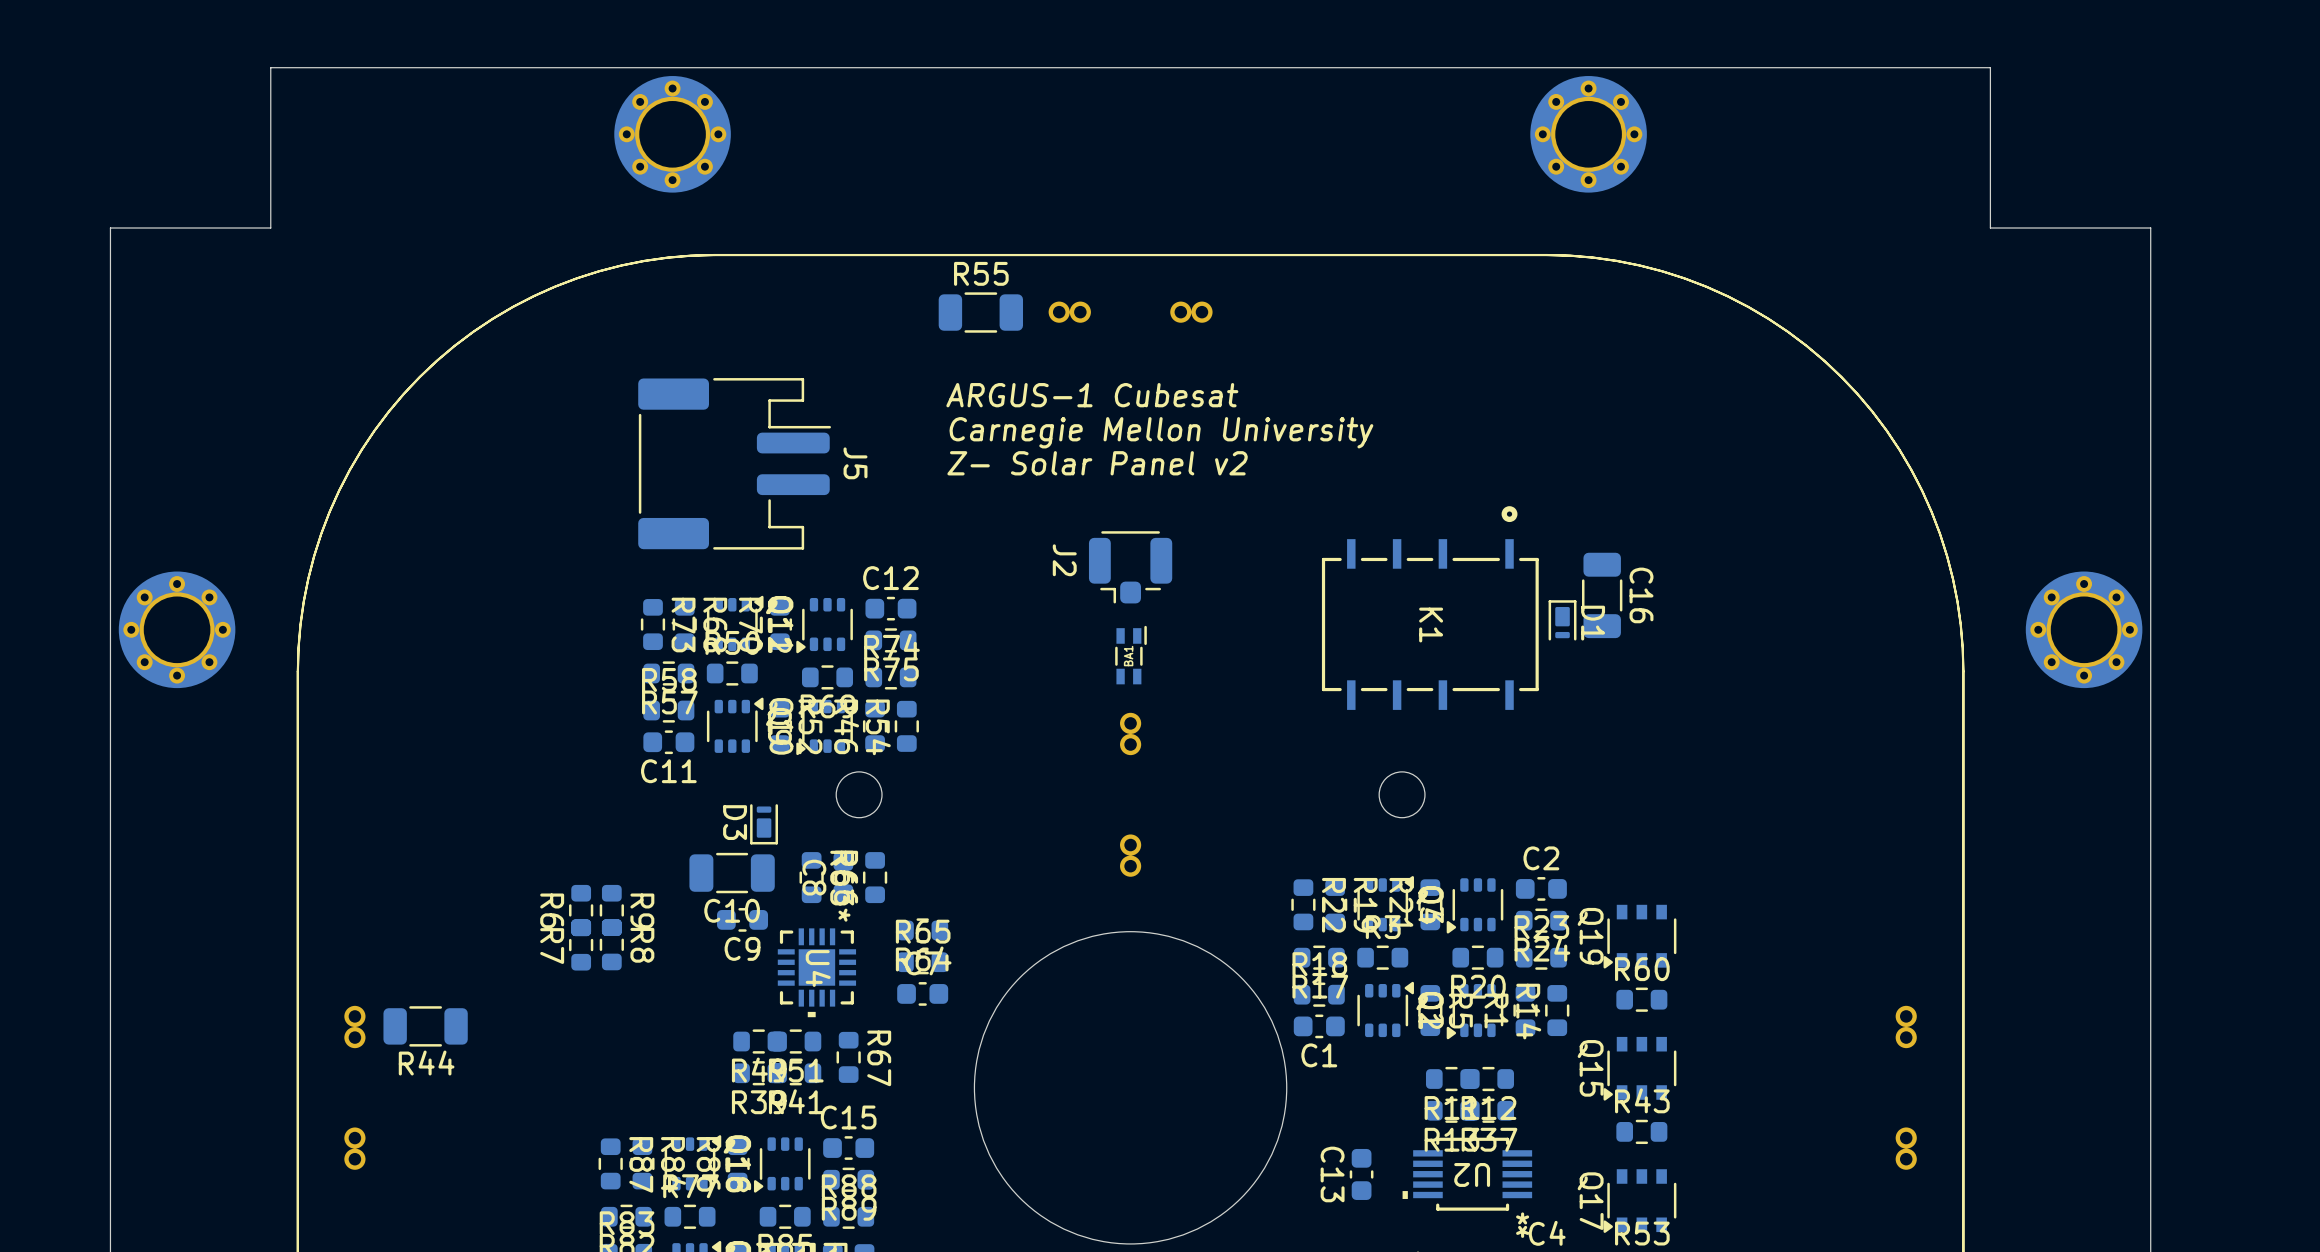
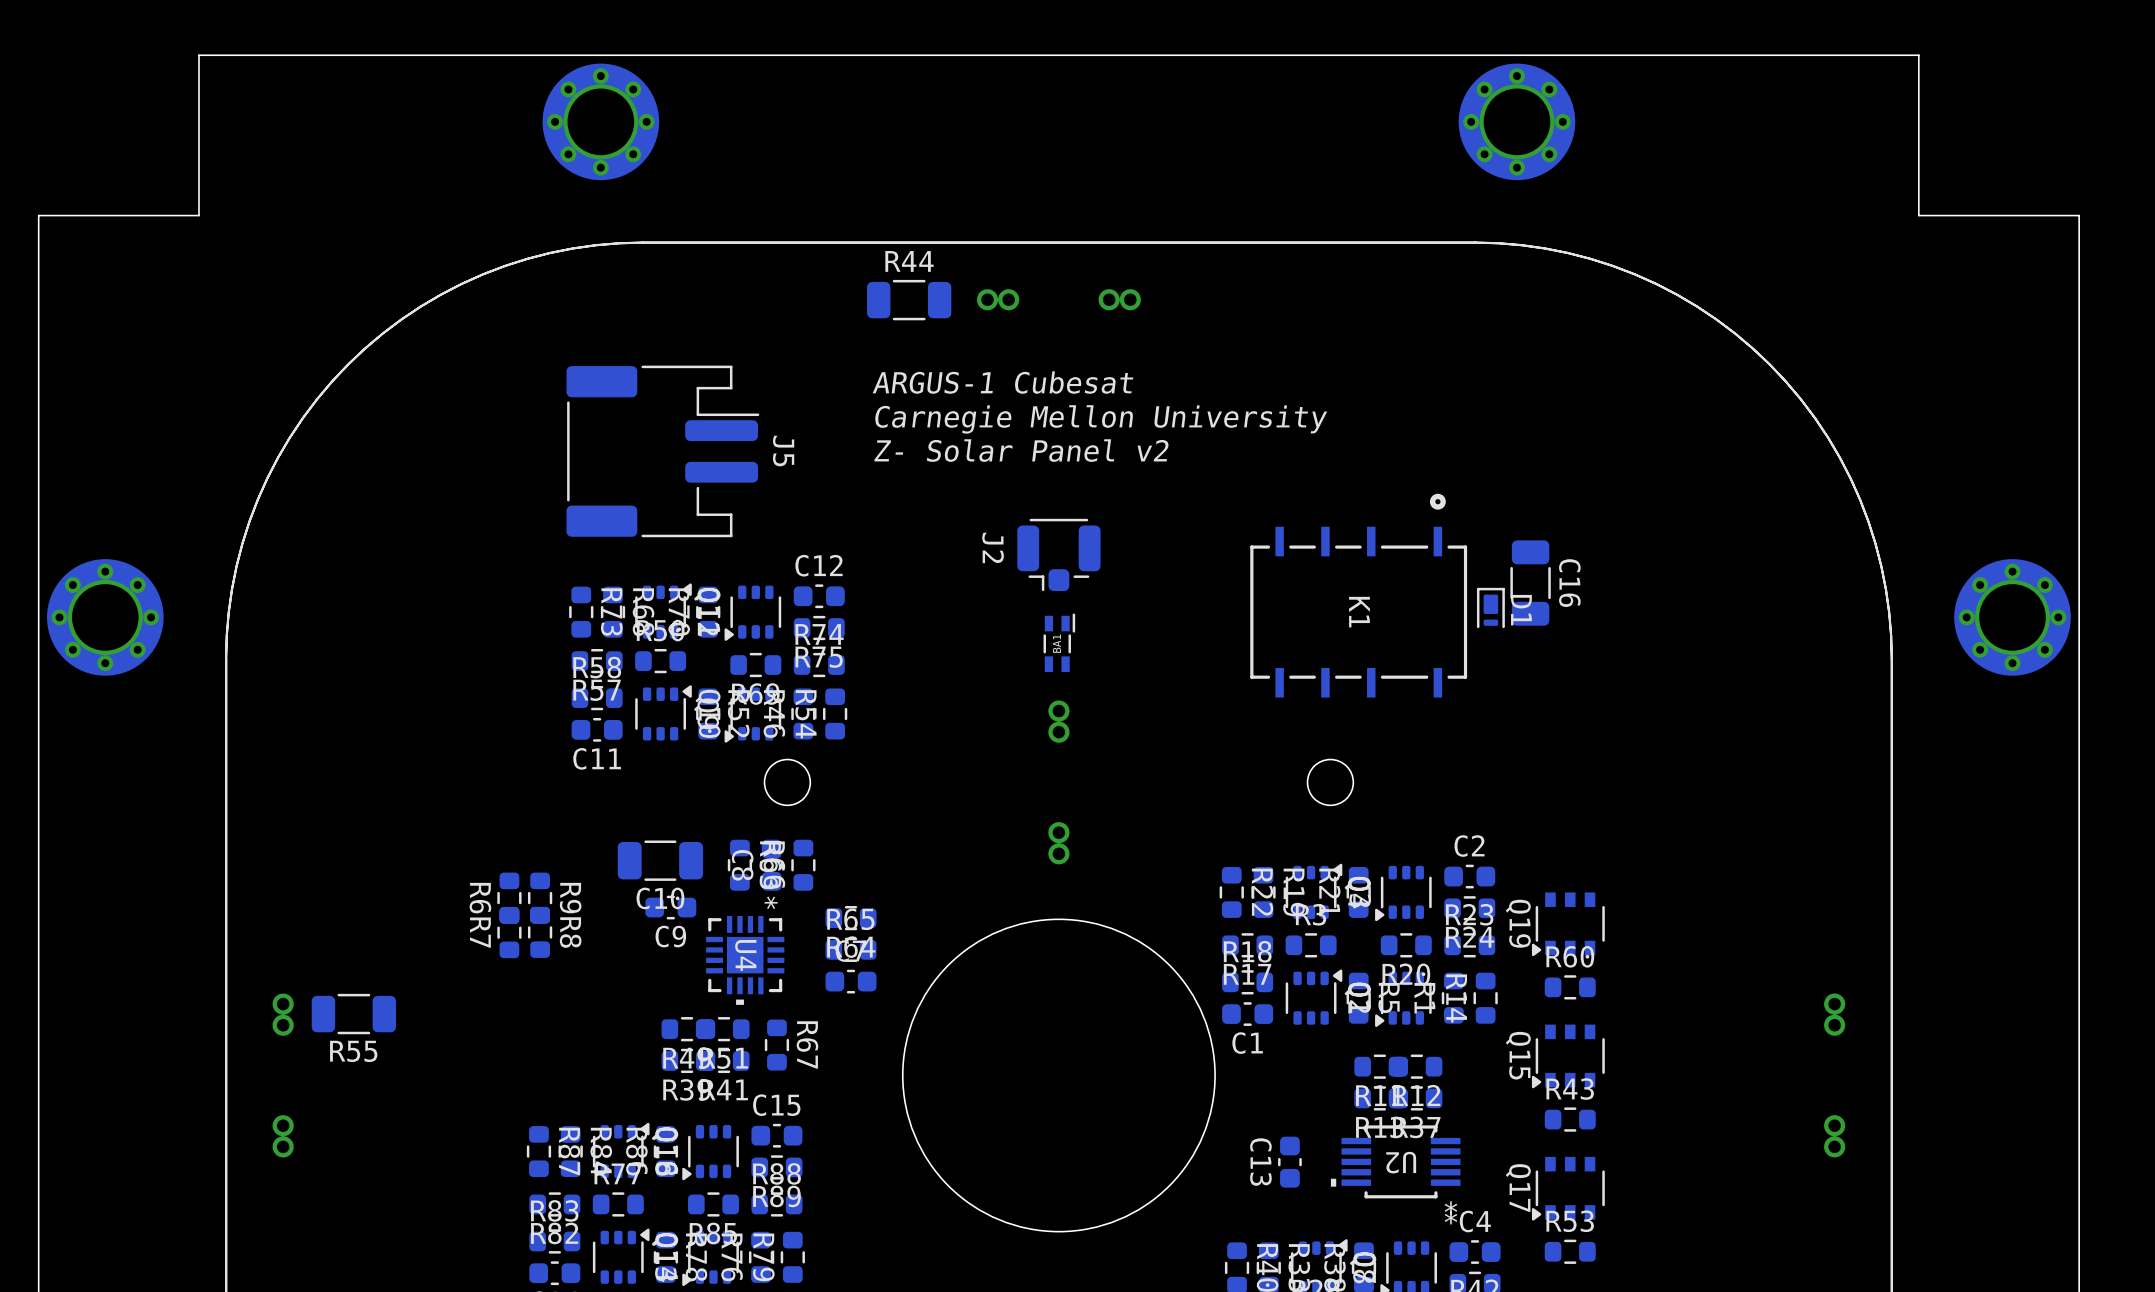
R55 name: R55 (981, 273) -> R44 (909, 261)
D3: (764, 824) -> none
R44 name: R44 (426, 1063) -> R55 (353, 1051)

